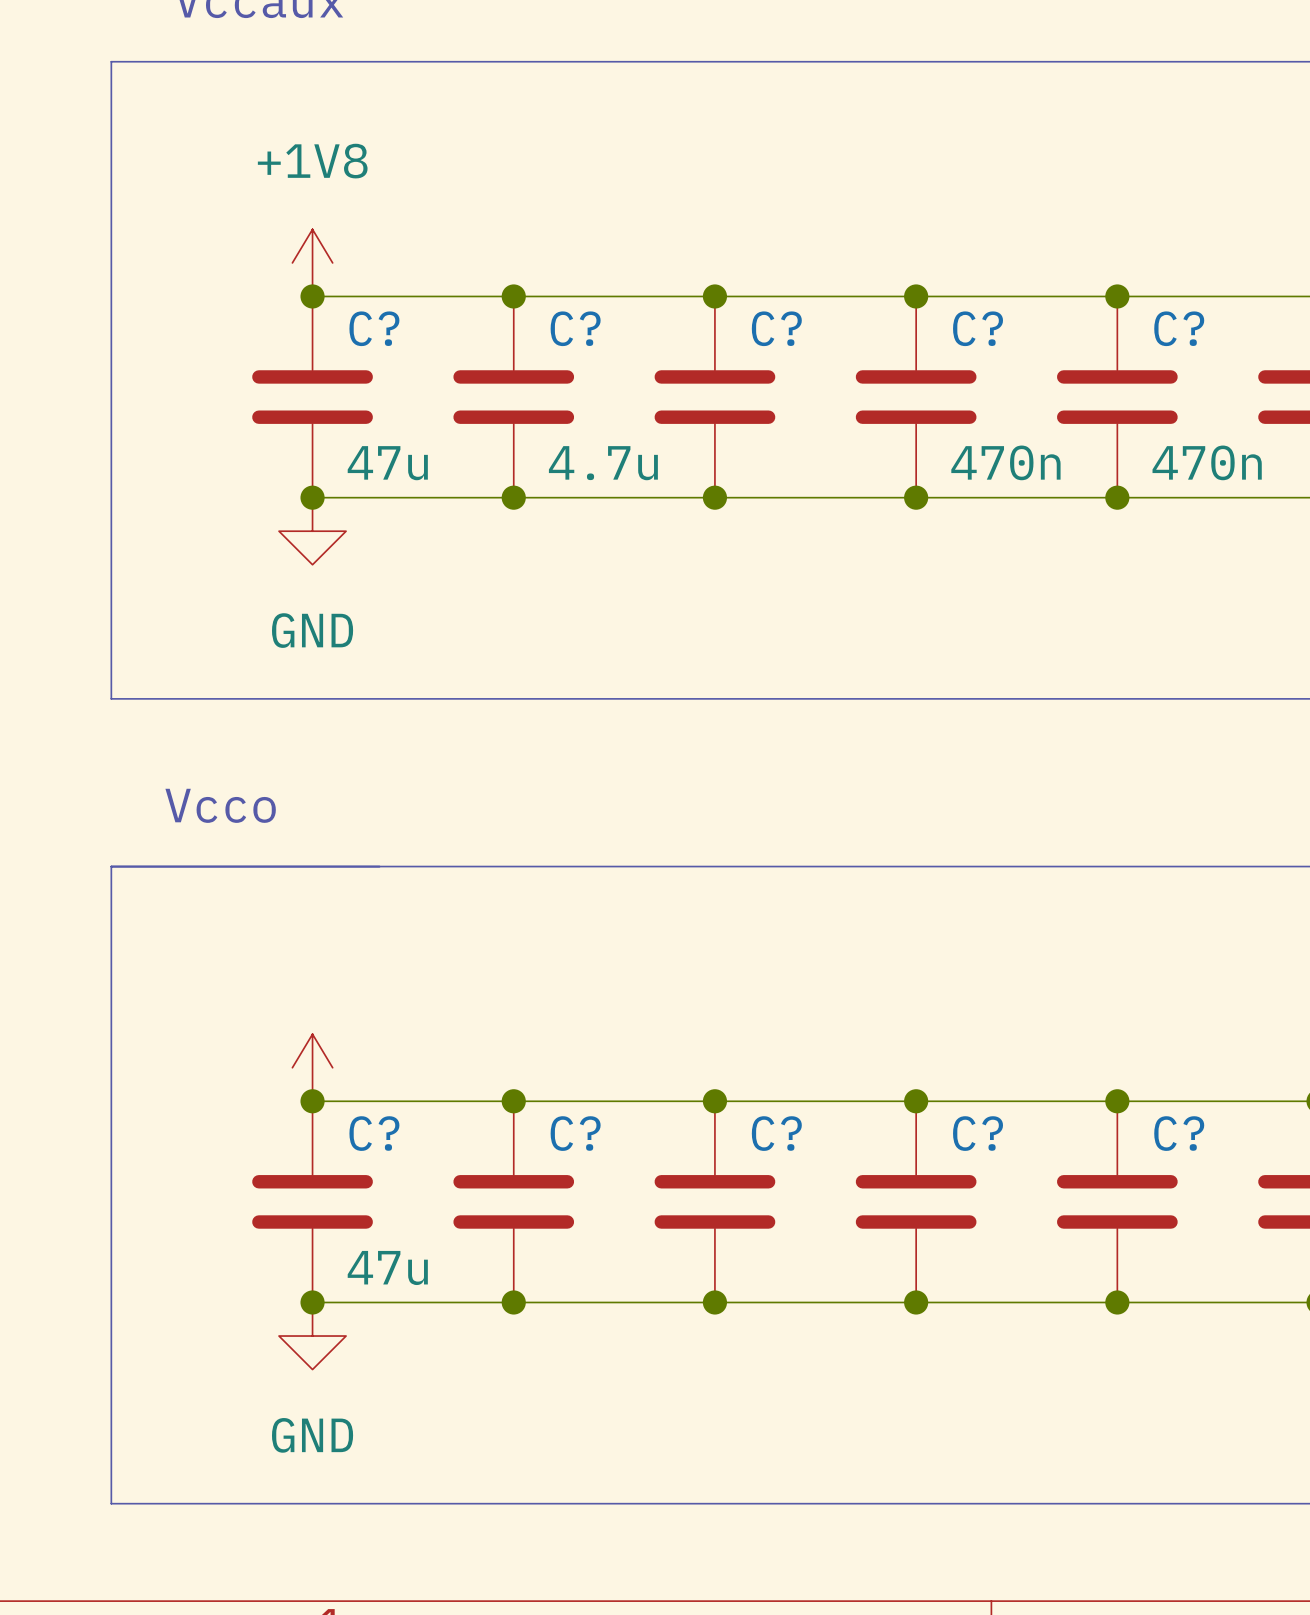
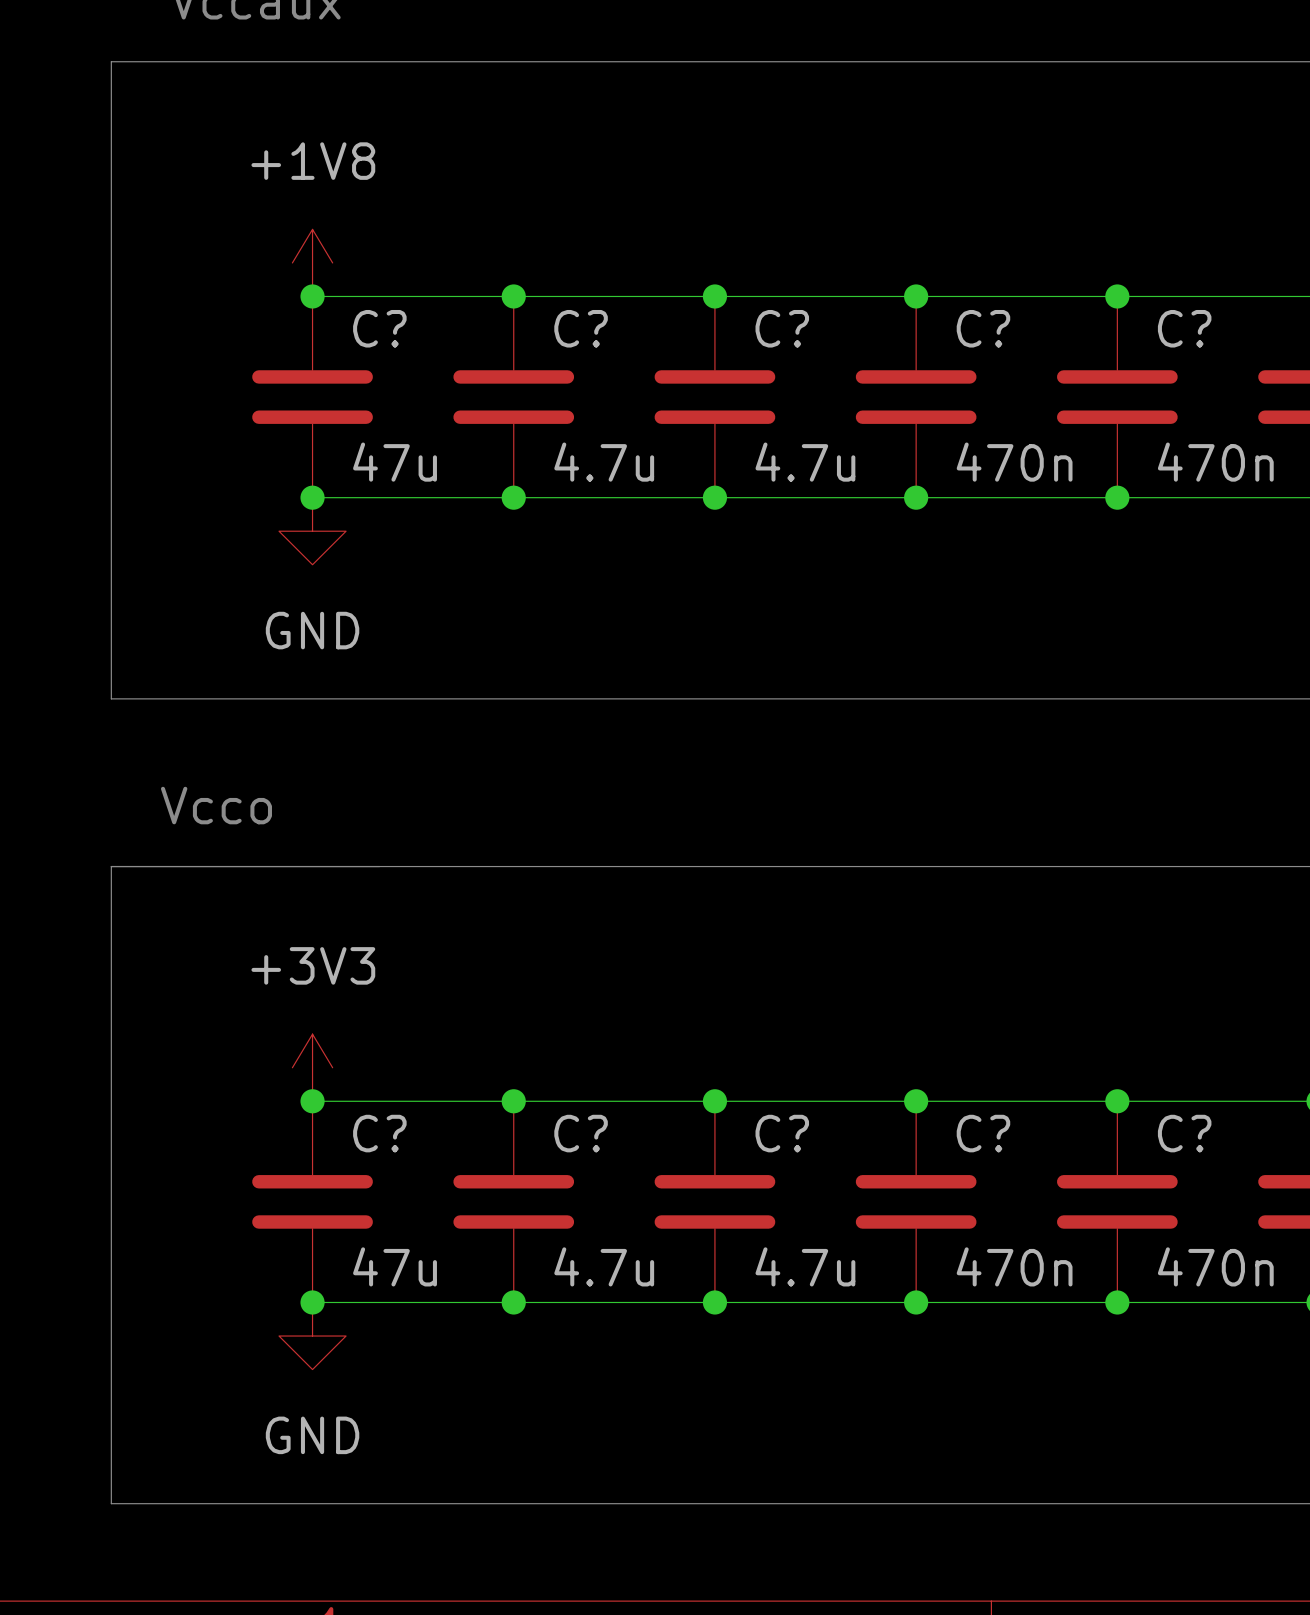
C? value: none -> 4.7u (805, 462)
power symbol text: none -> +3V3 (313, 965)
C? value: none -> 4.7u (604, 1266)
C? value: none -> 4.7u (805, 1266)
C? value: none -> 470n (1014, 1266)
C? value: none -> 470n (1215, 1266)

